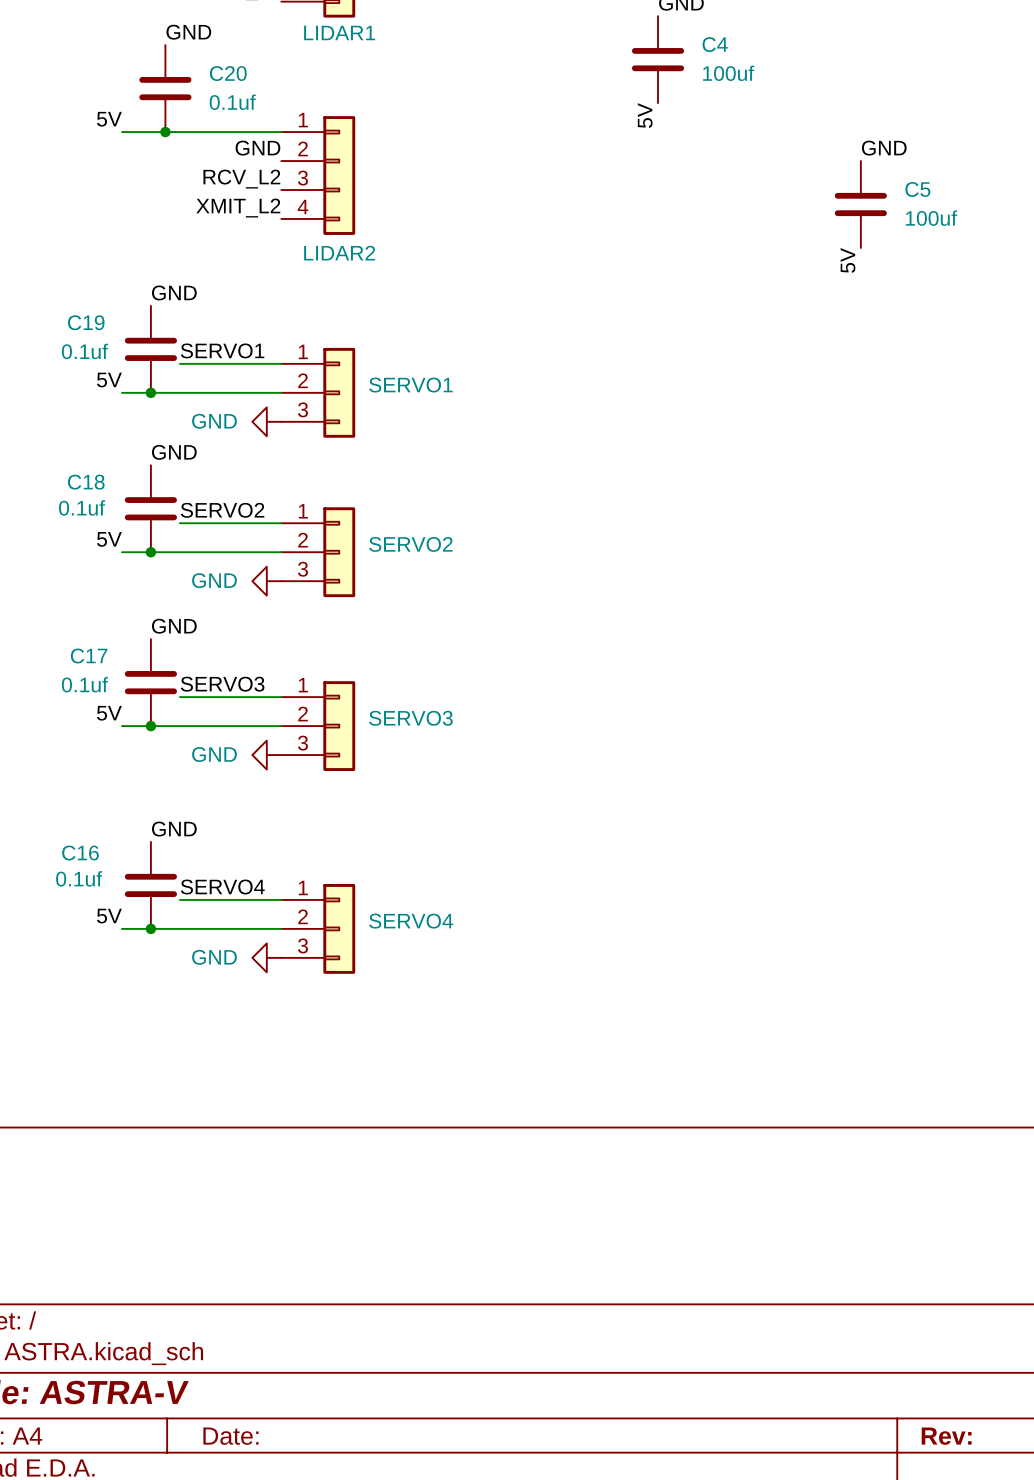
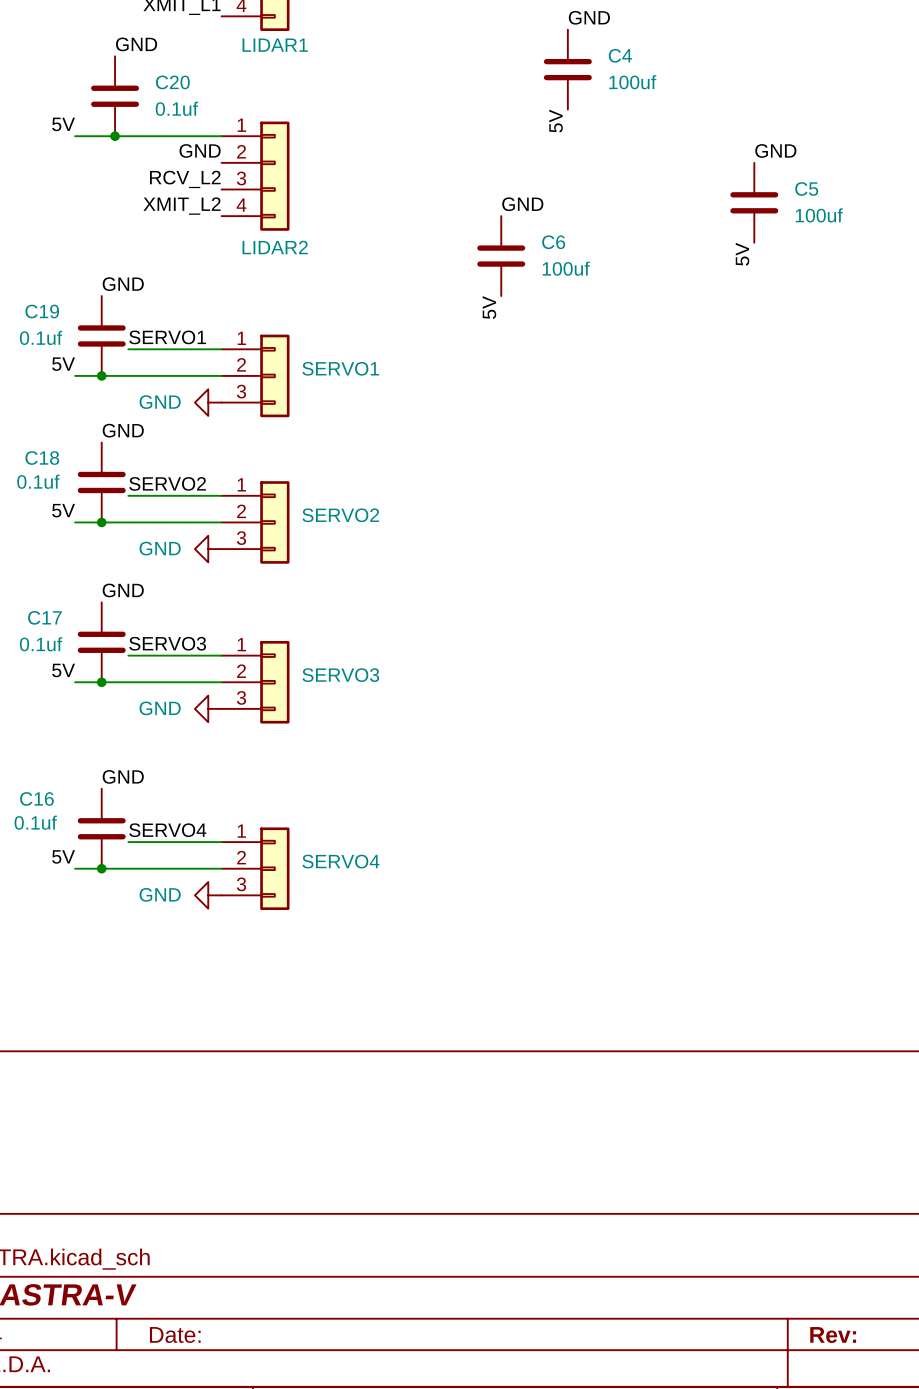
label: none -> GND (522, 204)
C6: none -> 100uf (501, 256)
label: none -> 5V (489, 307)

